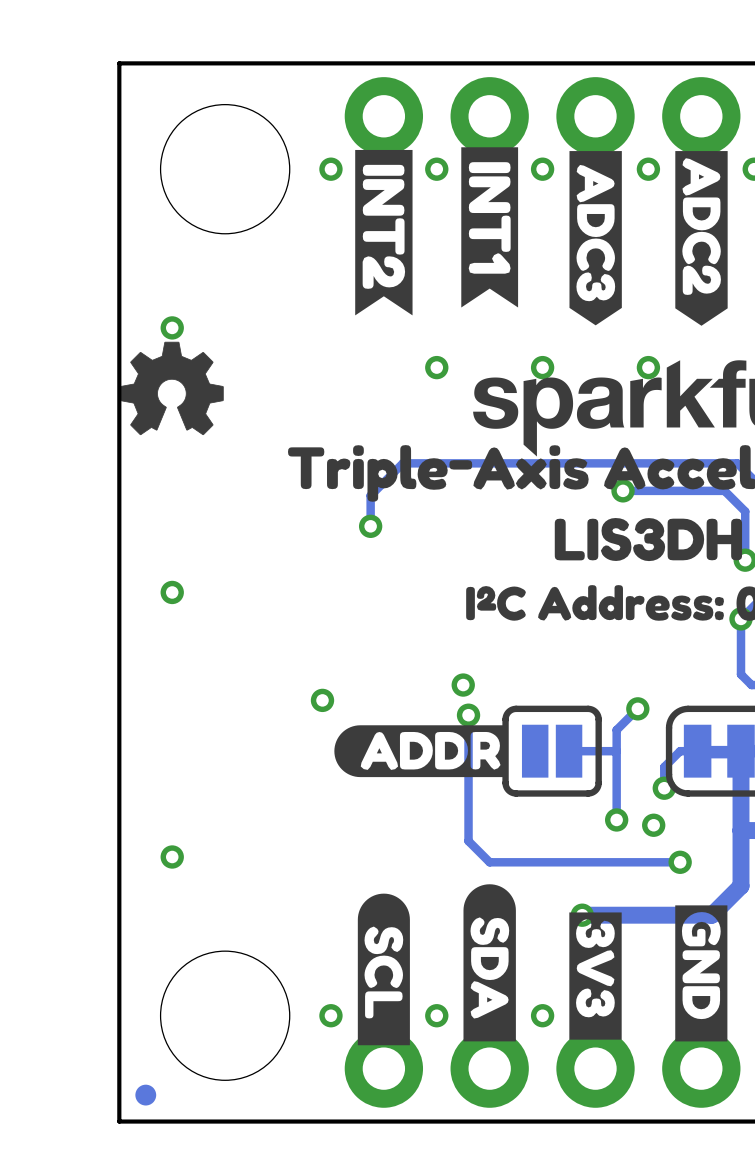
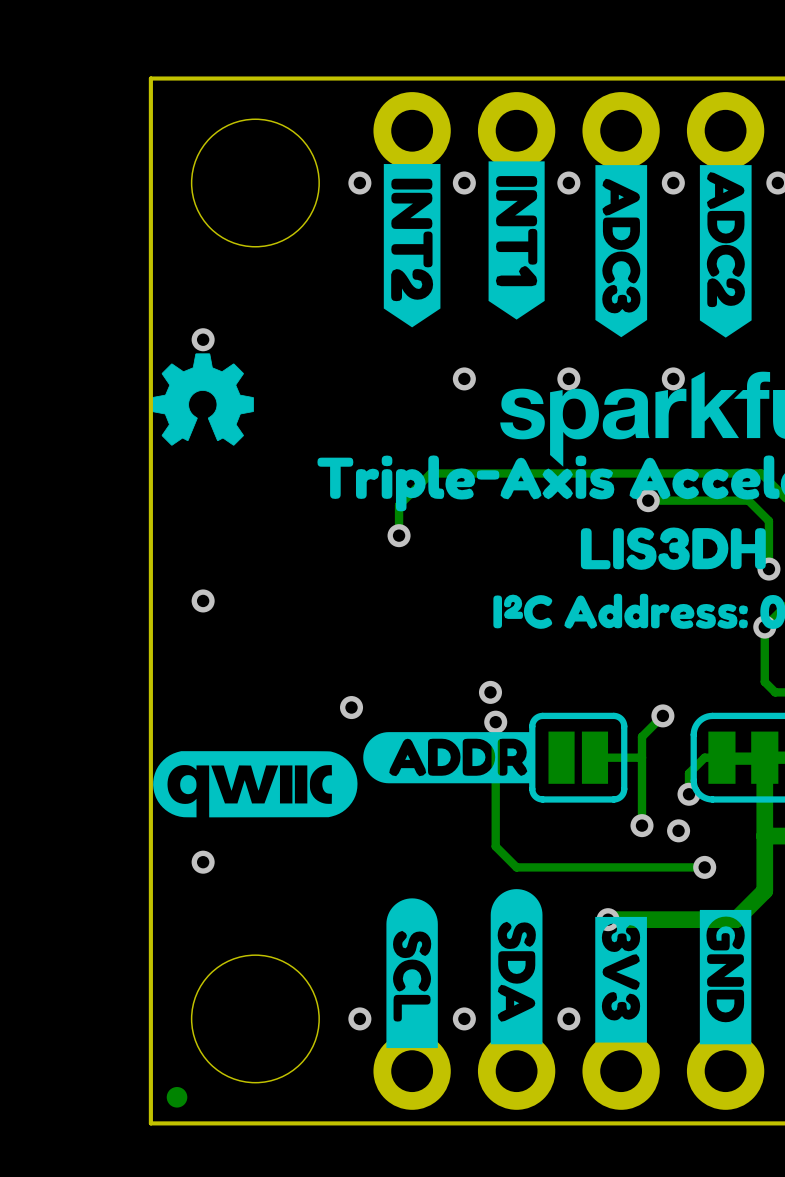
drawing shape: [461, 147, 519, 308] -> [488, 161, 545, 320]
drawing shape: [355, 149, 413, 316] -> [383, 164, 441, 328]
drawing: none -> [153, 751, 358, 818]

